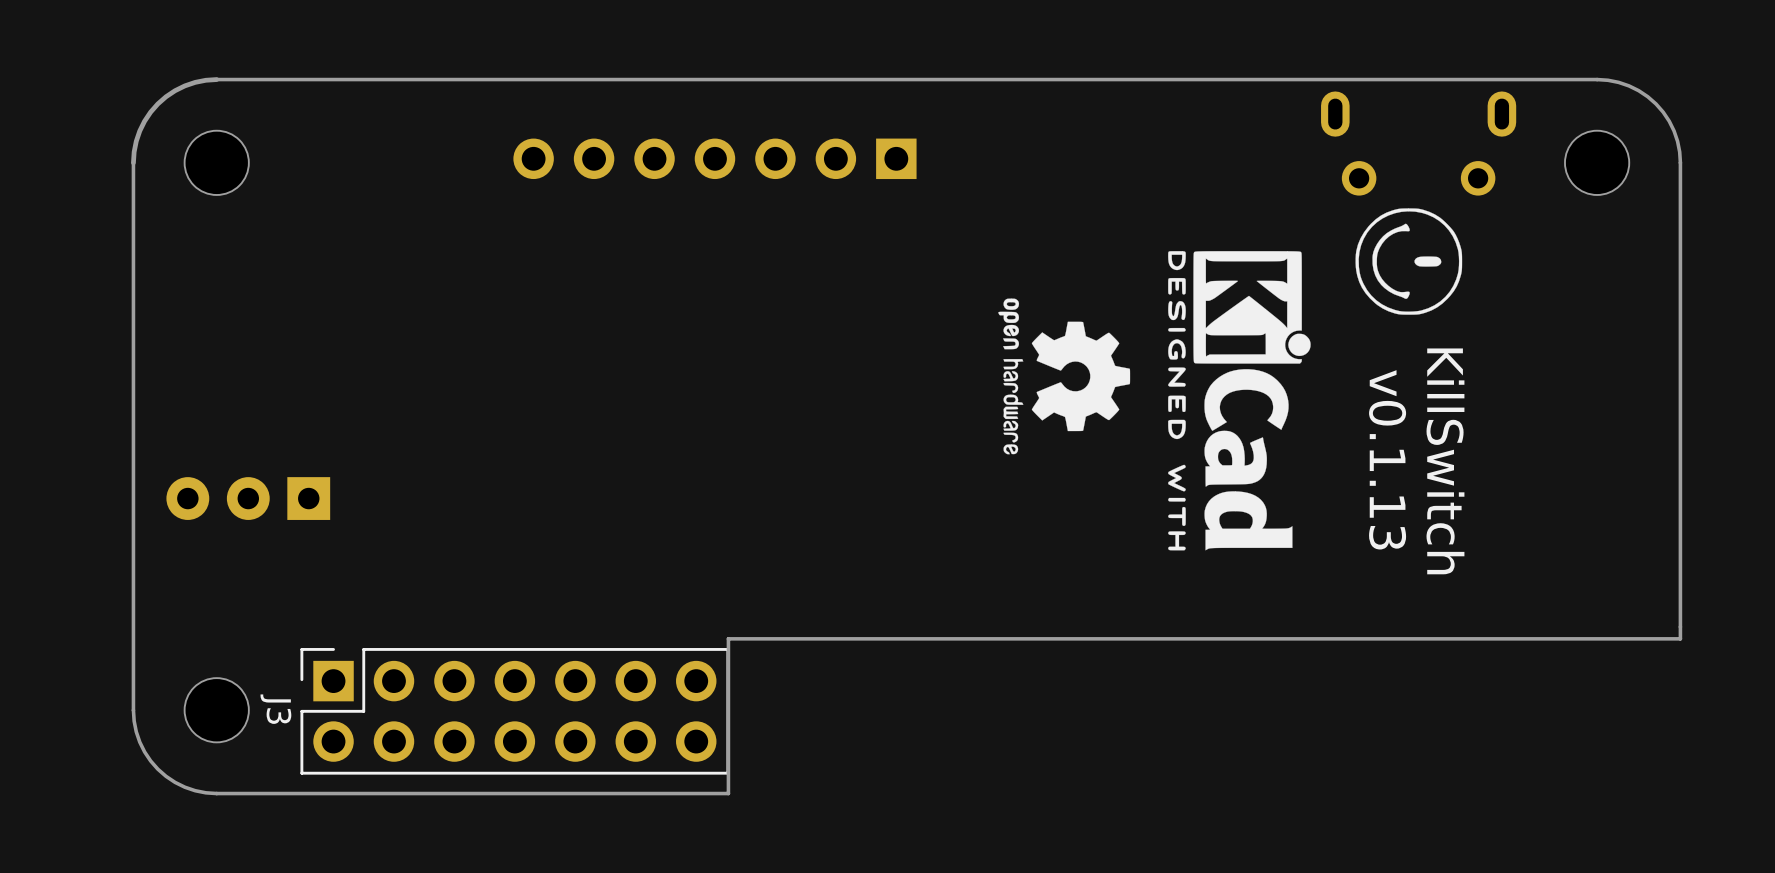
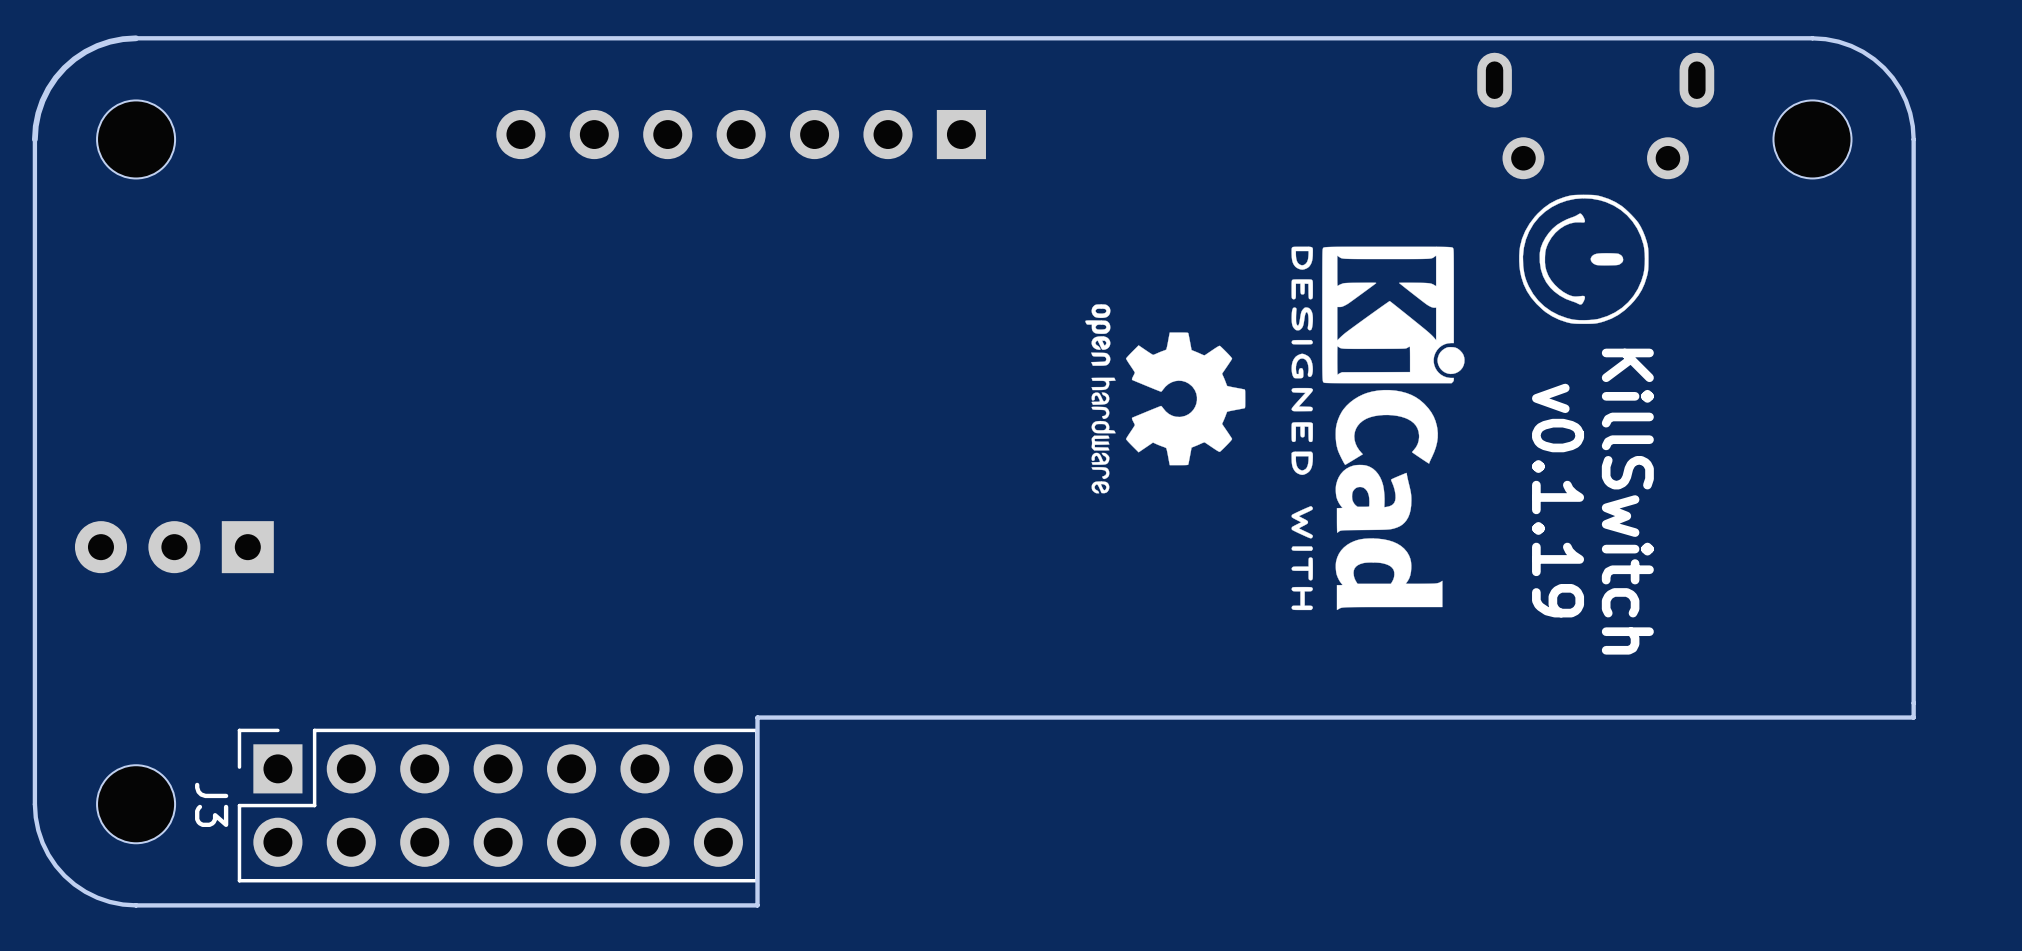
text: v0.1.13 (1387, 459) -> v0.1.19 (1558, 500)

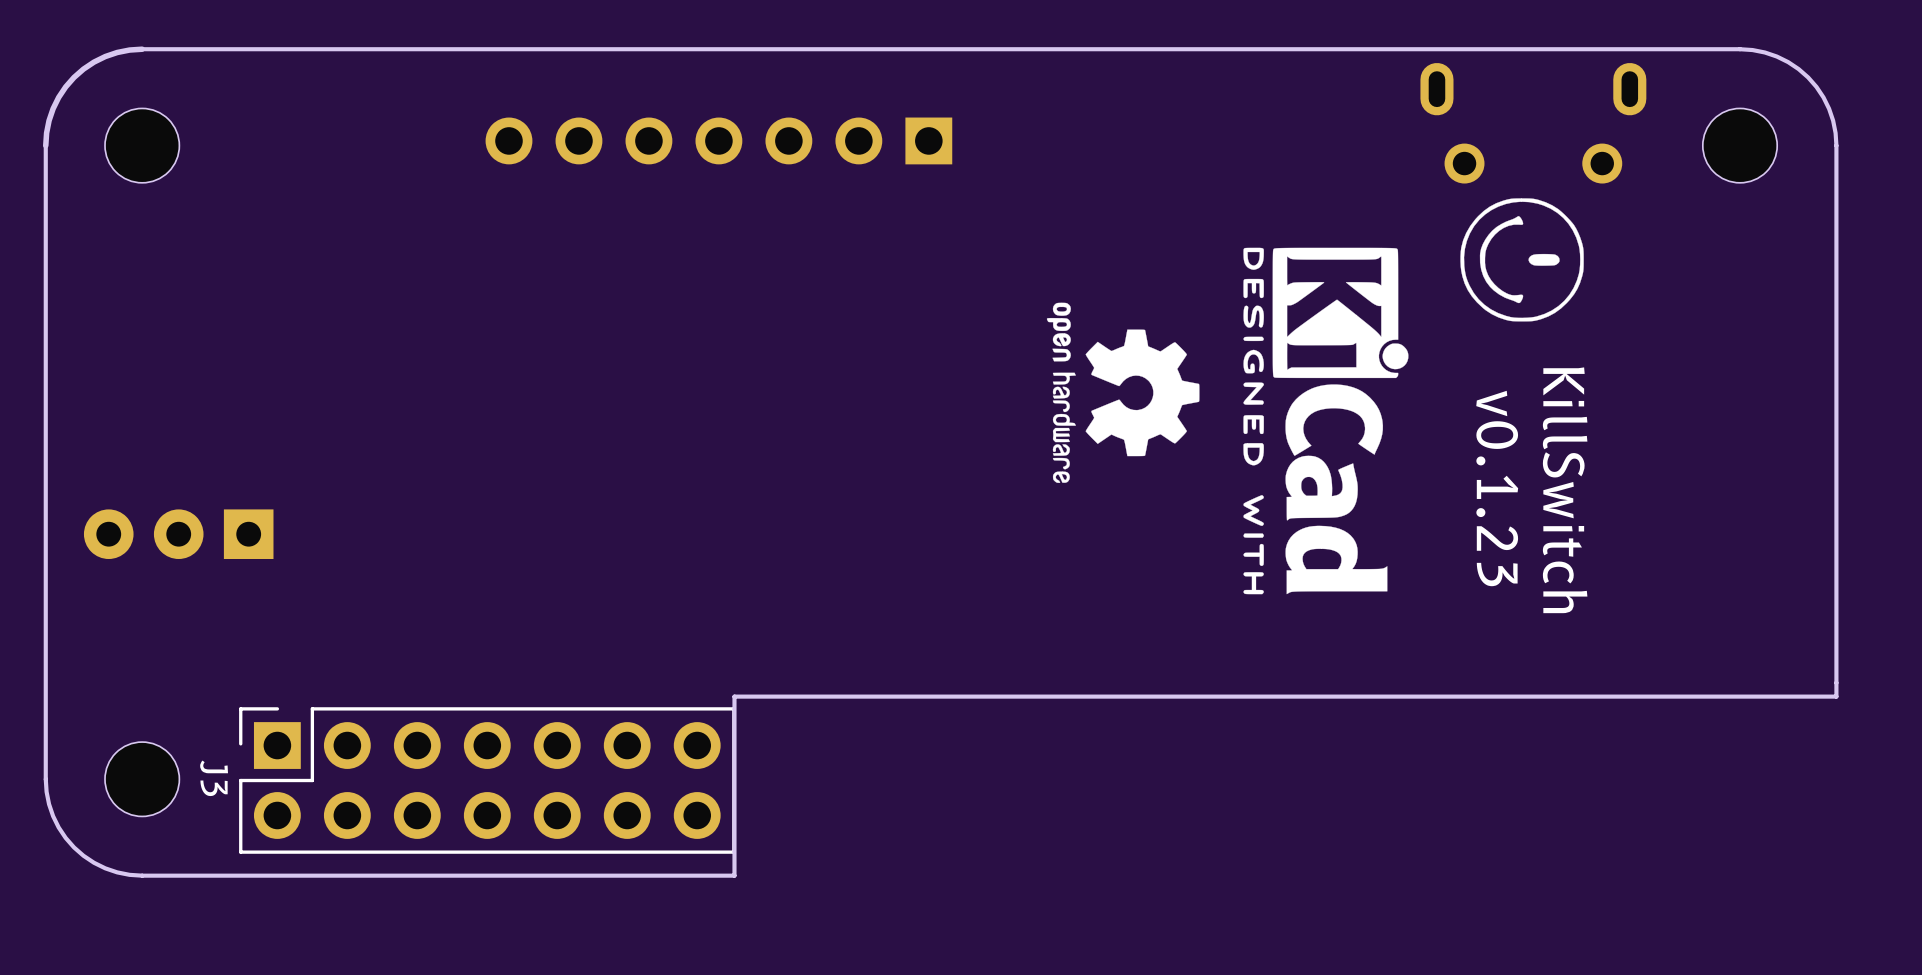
text: v0.1.19 (1558, 500) -> v0.1.23 (1497, 488)

